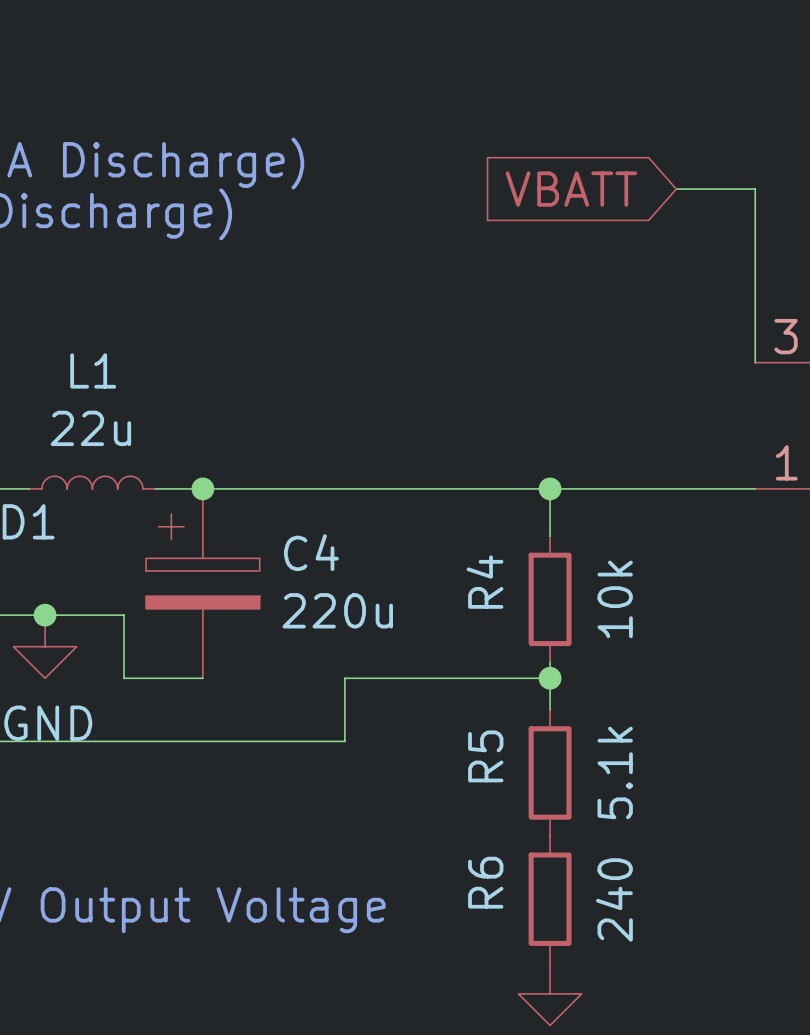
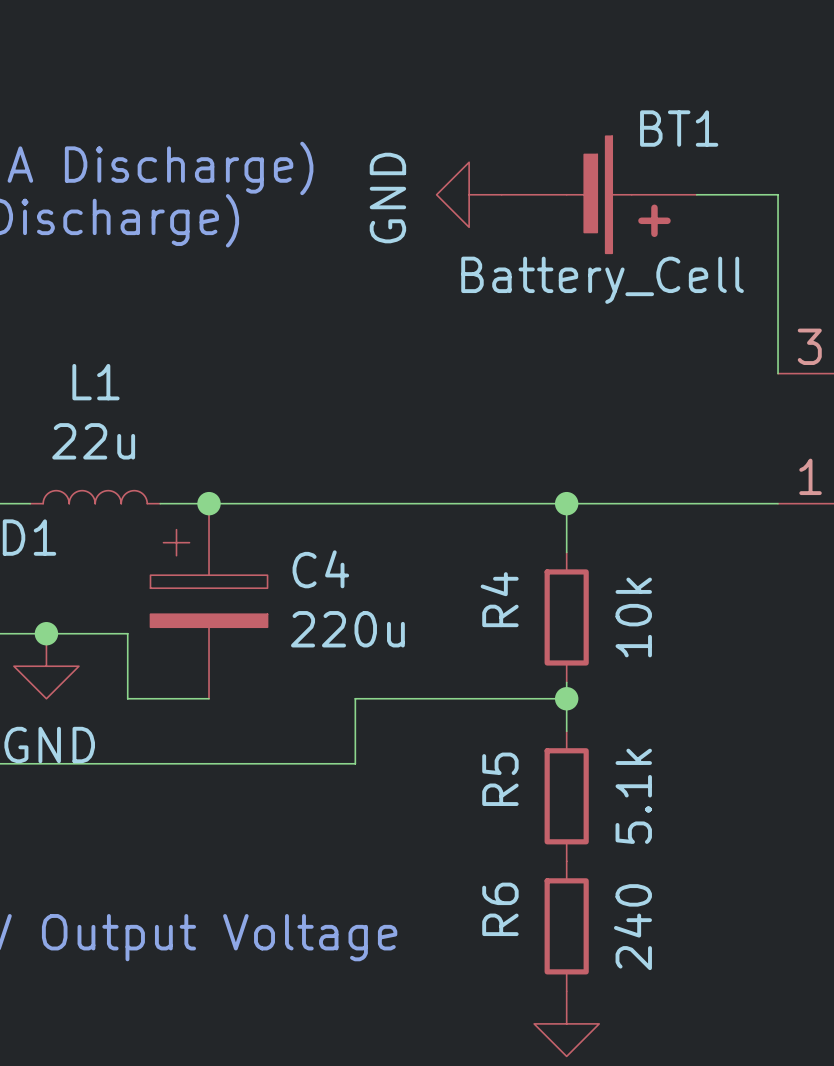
power symbol: none -> GND (469, 194)
global label: VBATT (571, 189) -> none
BT1: none -> Battery_Cell (599, 194)

